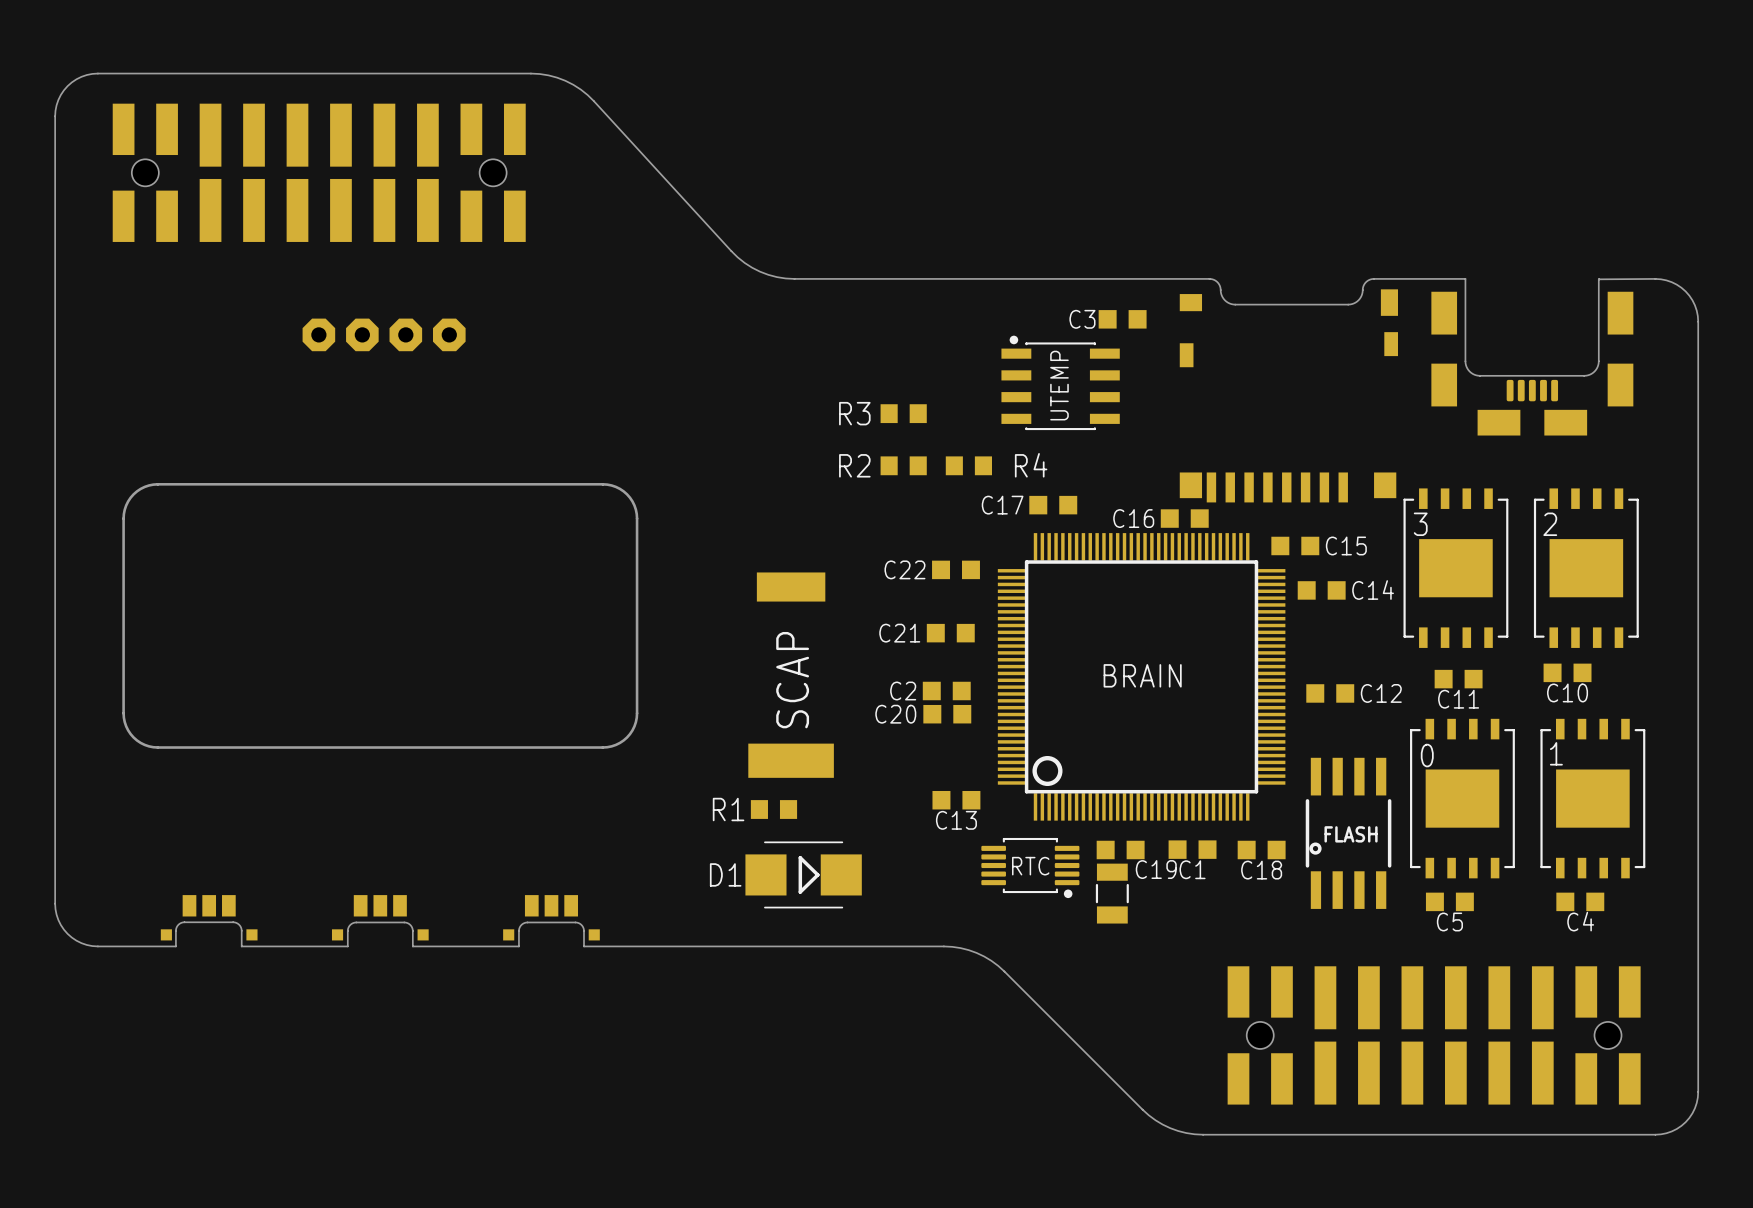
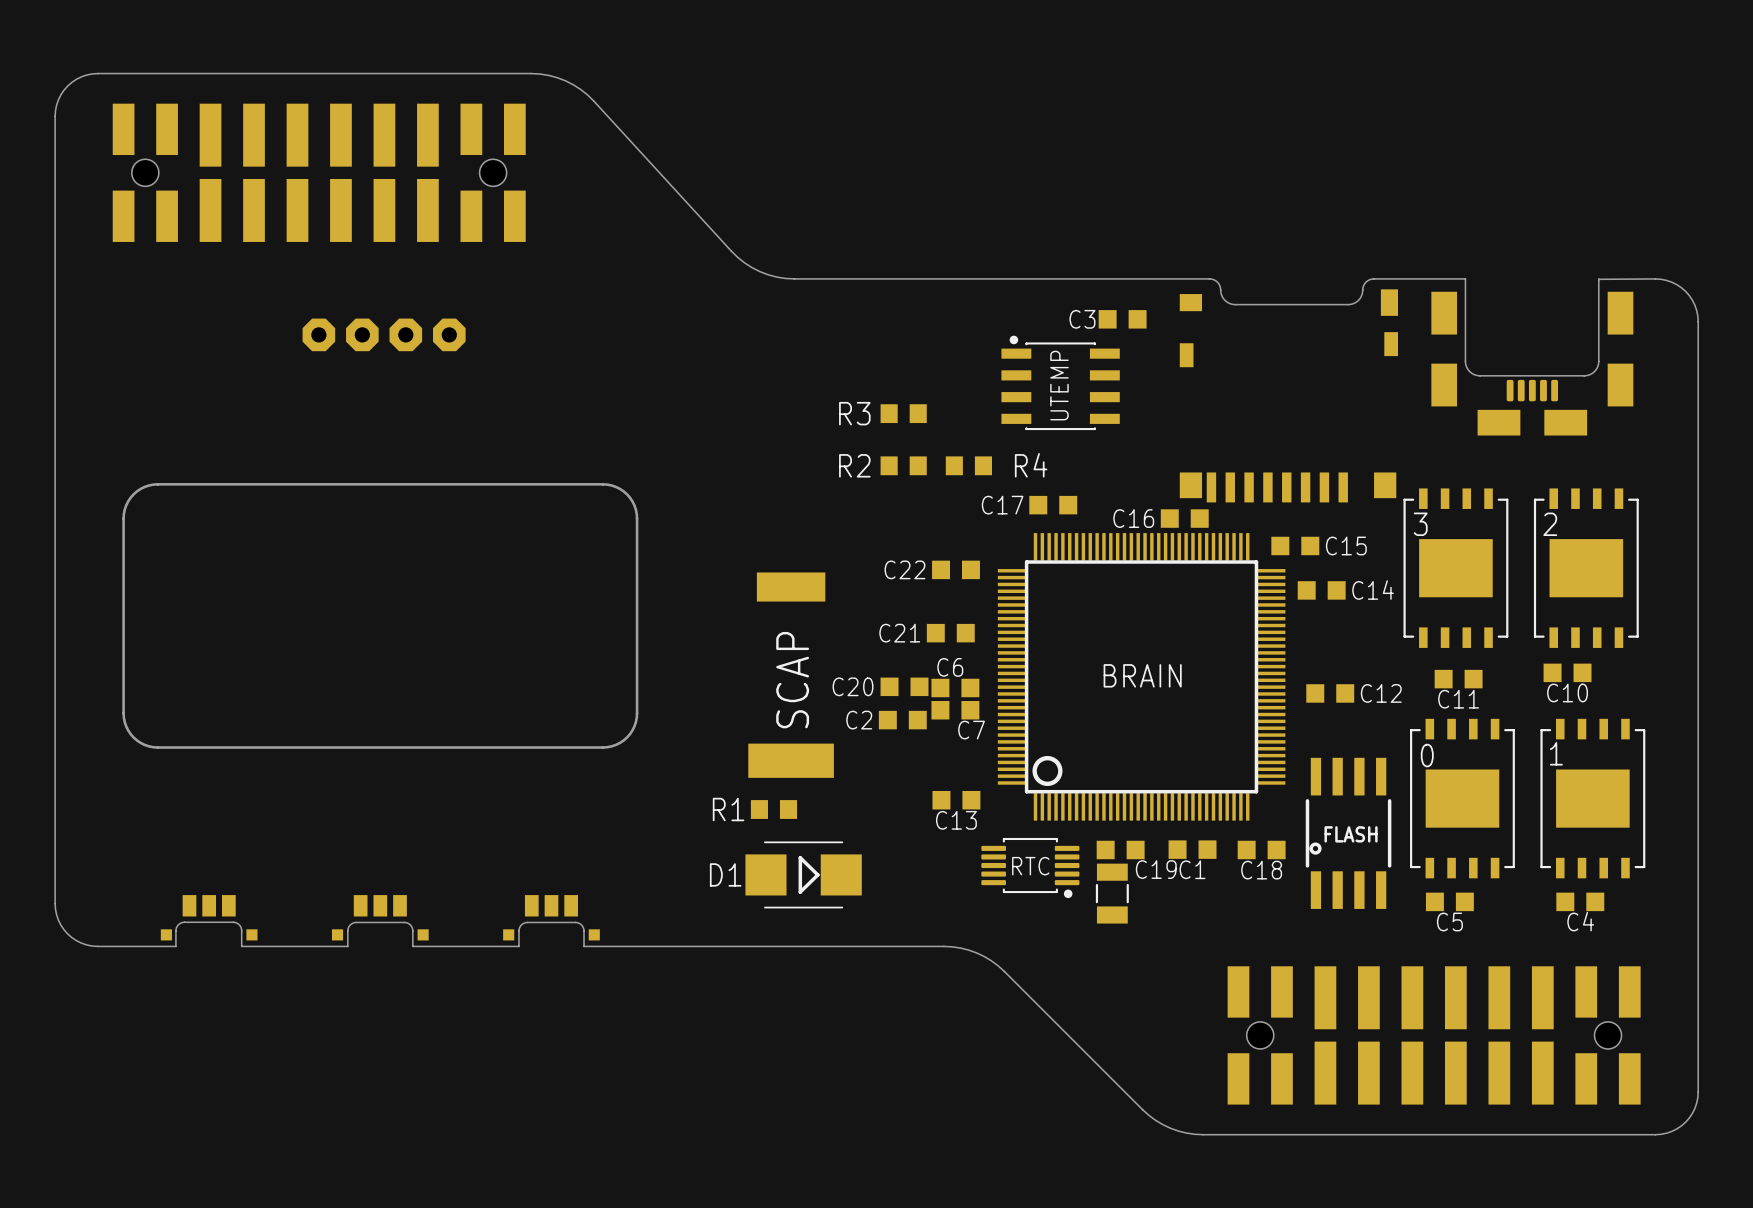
C6: none -> (955, 687)
C2 position: (946, 691) -> (902, 720)
C7: none -> (955, 710)
C20 position: (947, 714) -> (904, 686)

